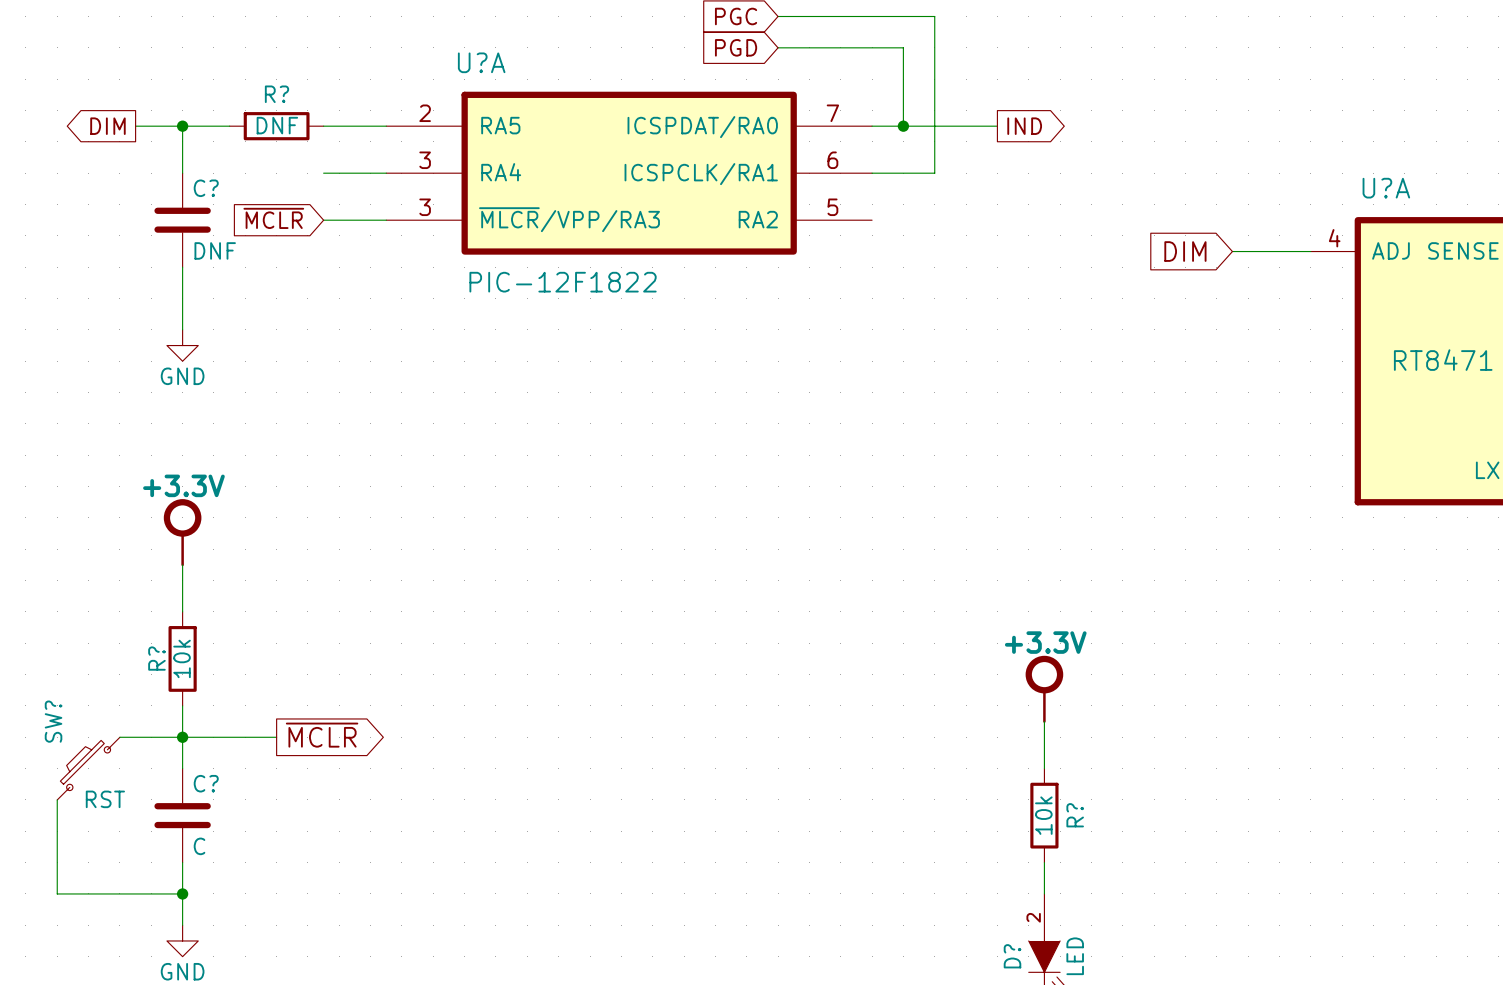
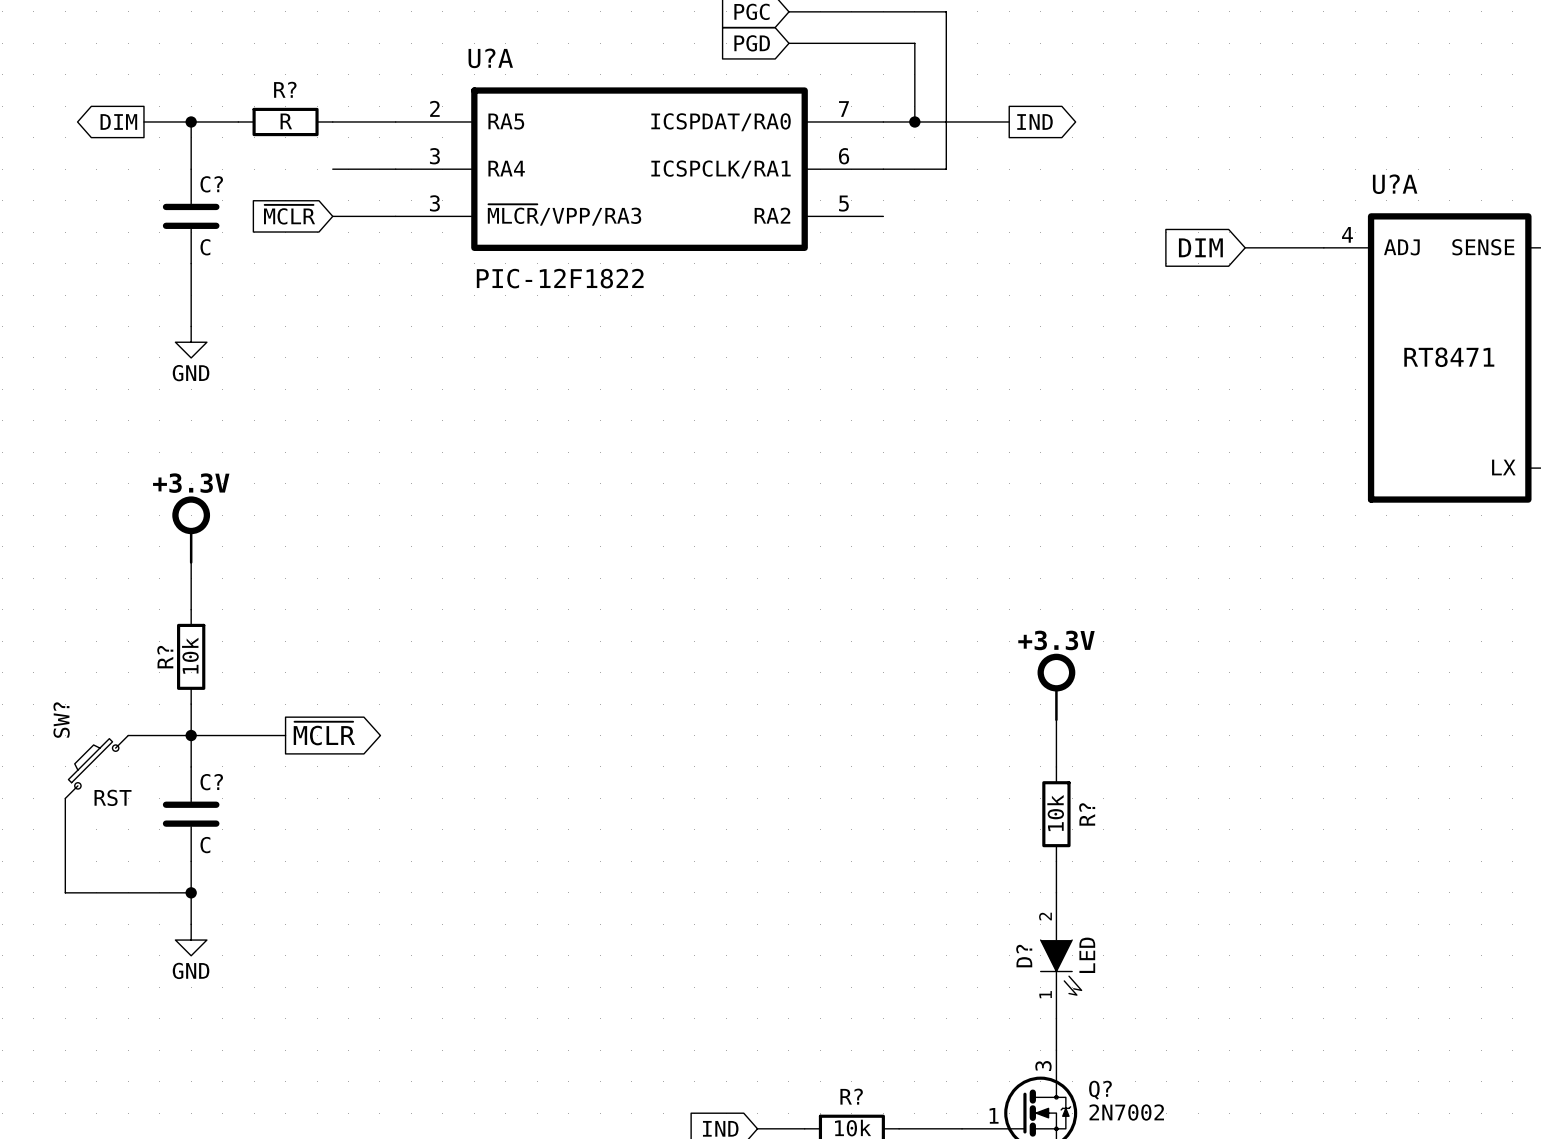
R? value: DNF (277, 125) -> R (286, 121)
C? value: DNF (215, 250) -> C (205, 247)

